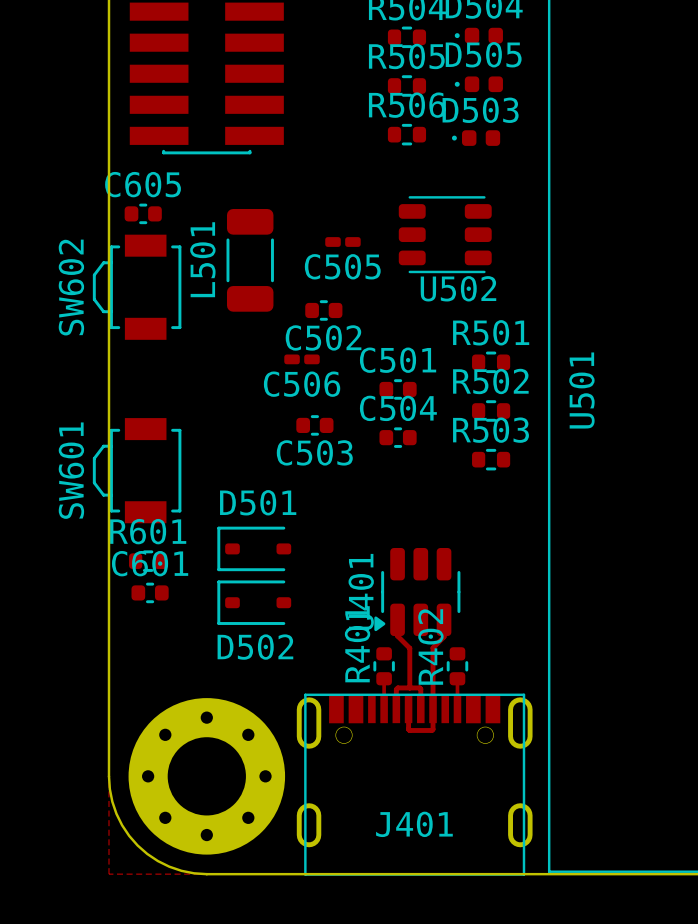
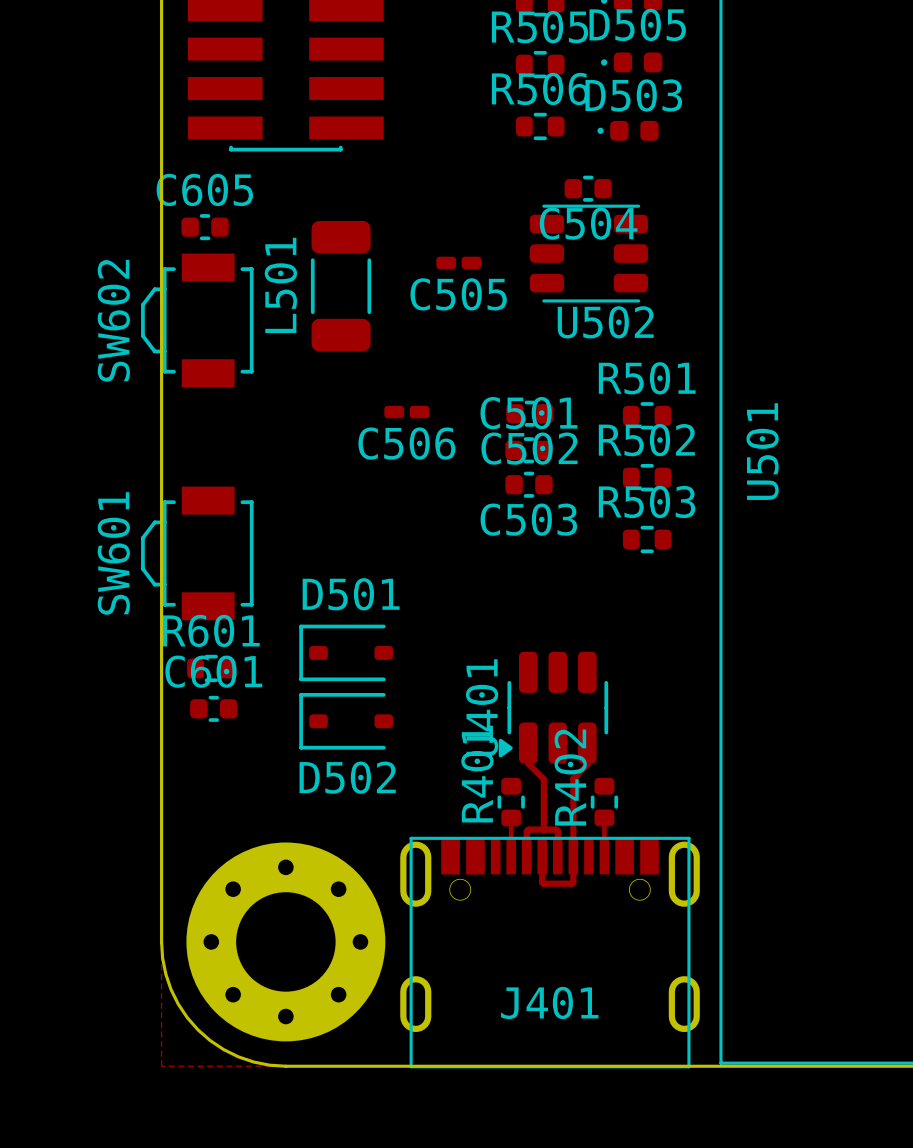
C502 position: (323, 310) -> (529, 413)
C504 name position: C504 (398, 408) -> C504 (588, 223)
C503 position: (314, 425) -> (529, 484)
C504 position: (398, 437) -> (588, 188)

